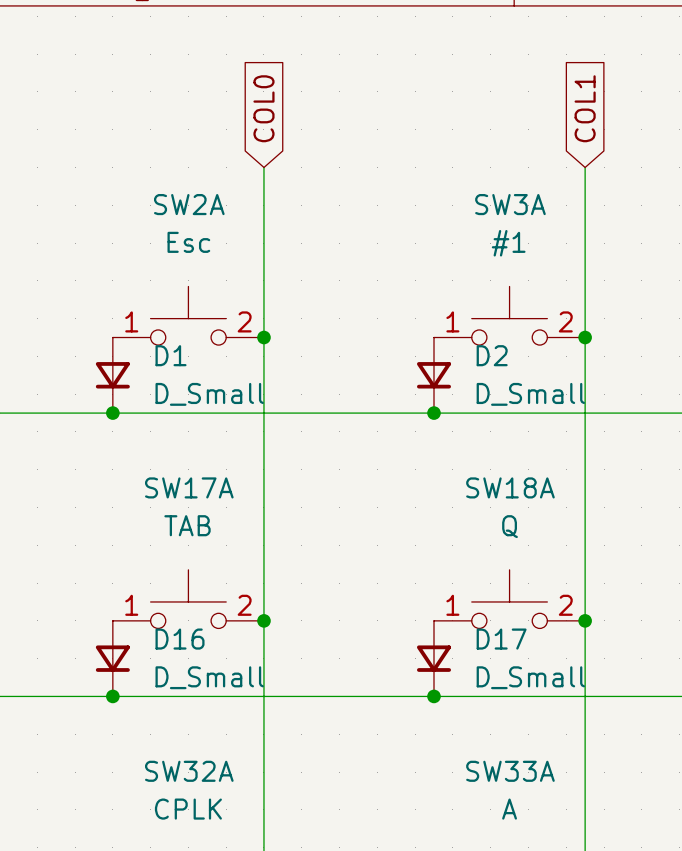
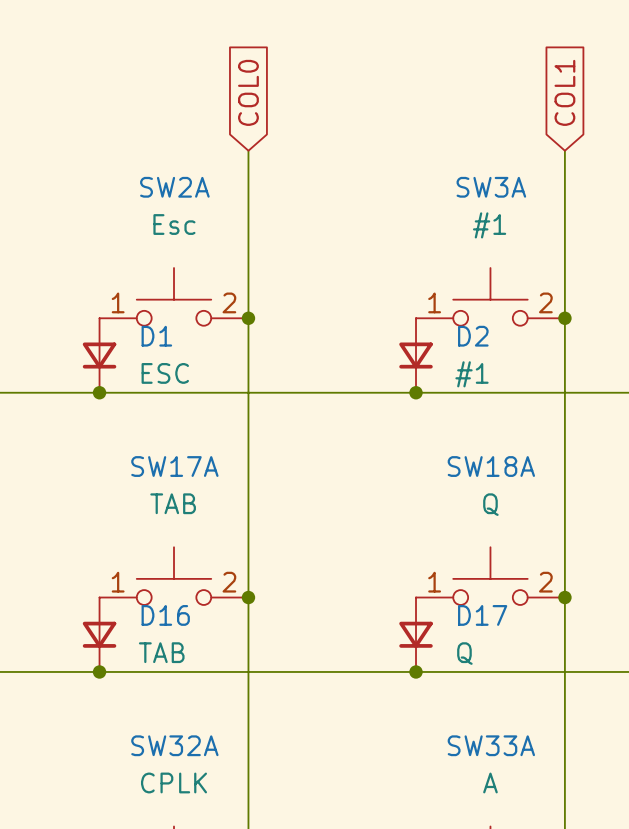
D1 value: D_Small (209, 394) -> ESC (165, 373)
D2 value: D_Small (530, 394) -> #1 (471, 374)
D16 value: D_Small (209, 677) -> TAB (161, 652)
D17 value: D_Small (530, 677) -> Q (464, 653)

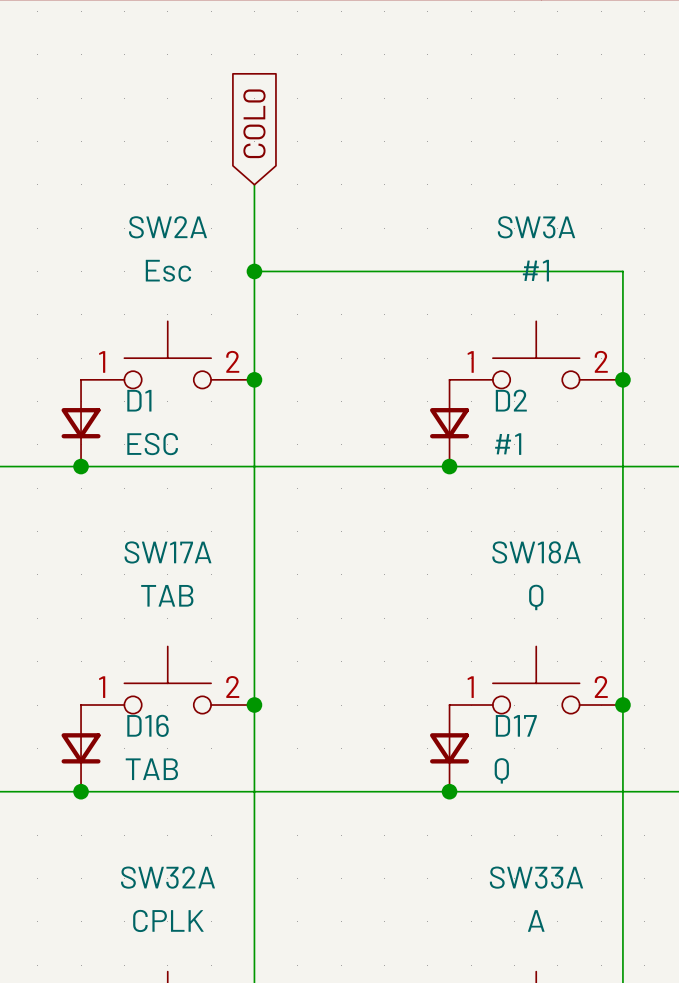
global label: COL1 (564, 92) -> none
wire: (564, 150) (564, 225) -> (254, 271) (622, 271)
junction: none -> (254, 271)

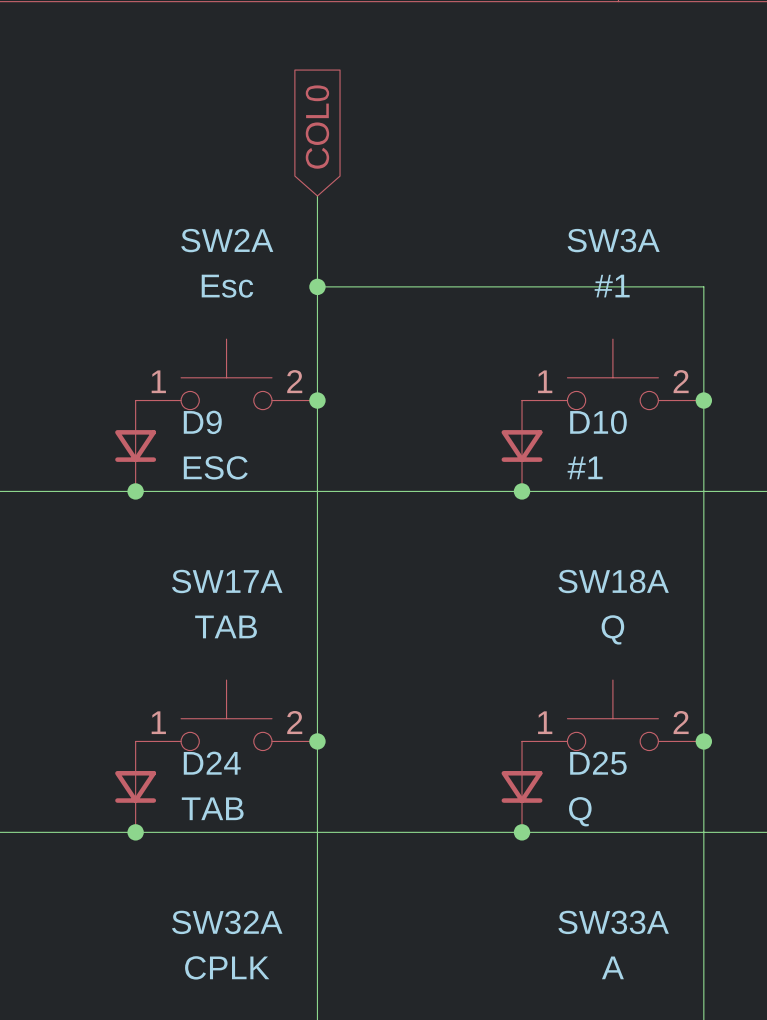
D1 name: D1 (139, 400) -> D9 (202, 422)
D2 name: D2 (511, 400) -> D10 (598, 422)
D16 name: D16 (148, 725) -> D24 (212, 763)
D17 name: D17 (516, 725) -> D25 (598, 763)

